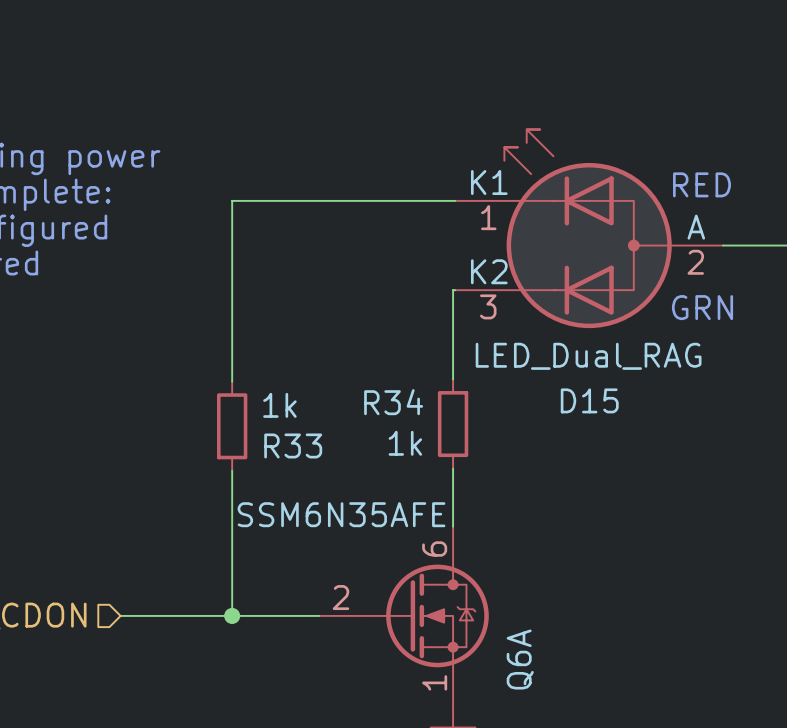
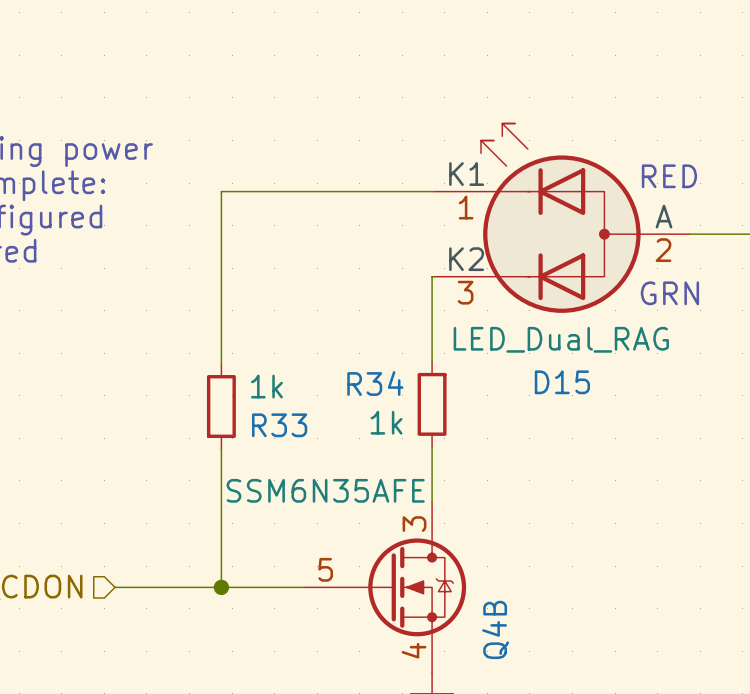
Q6A pin number: 6 (434, 549) -> 3 (414, 524)
Q6A pin number: 2 (340, 597) -> 5 (325, 569)
Q6A name: Q6A (520, 659) -> Q4B (495, 629)
Q6A pin number: 1 (434, 682) -> 4 (414, 650)

